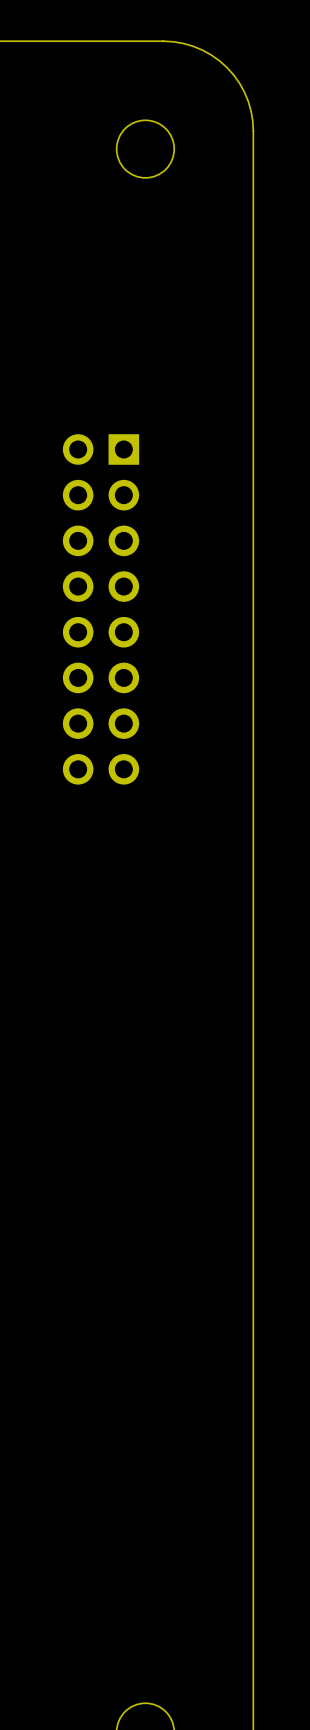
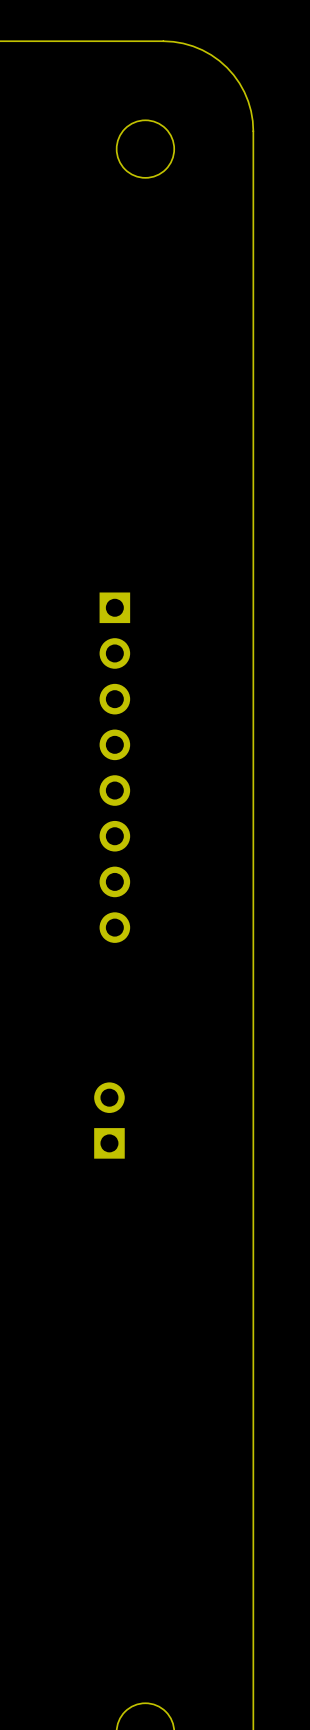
part: (101, 609) -> none
part: none -> (114, 767)
part: none -> (109, 1120)

